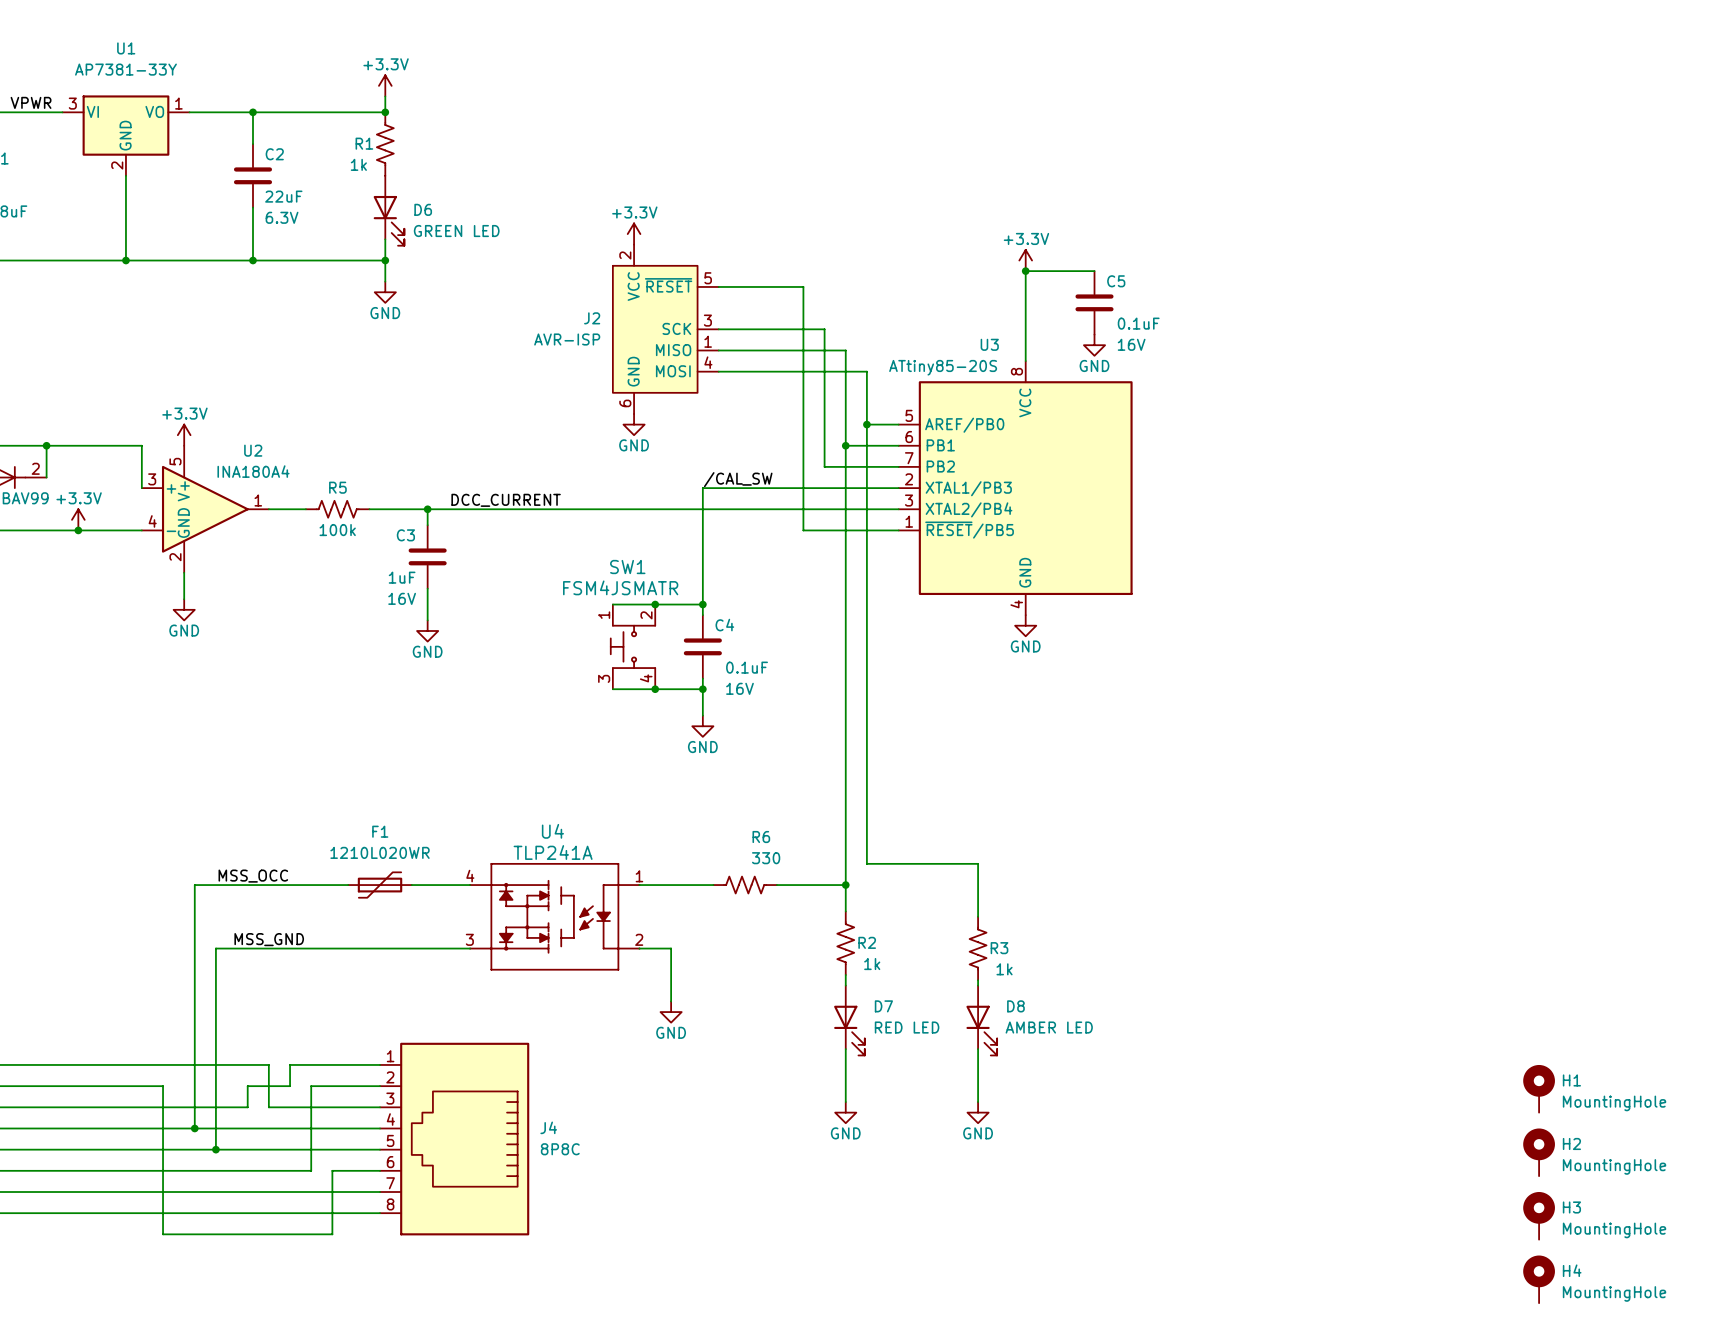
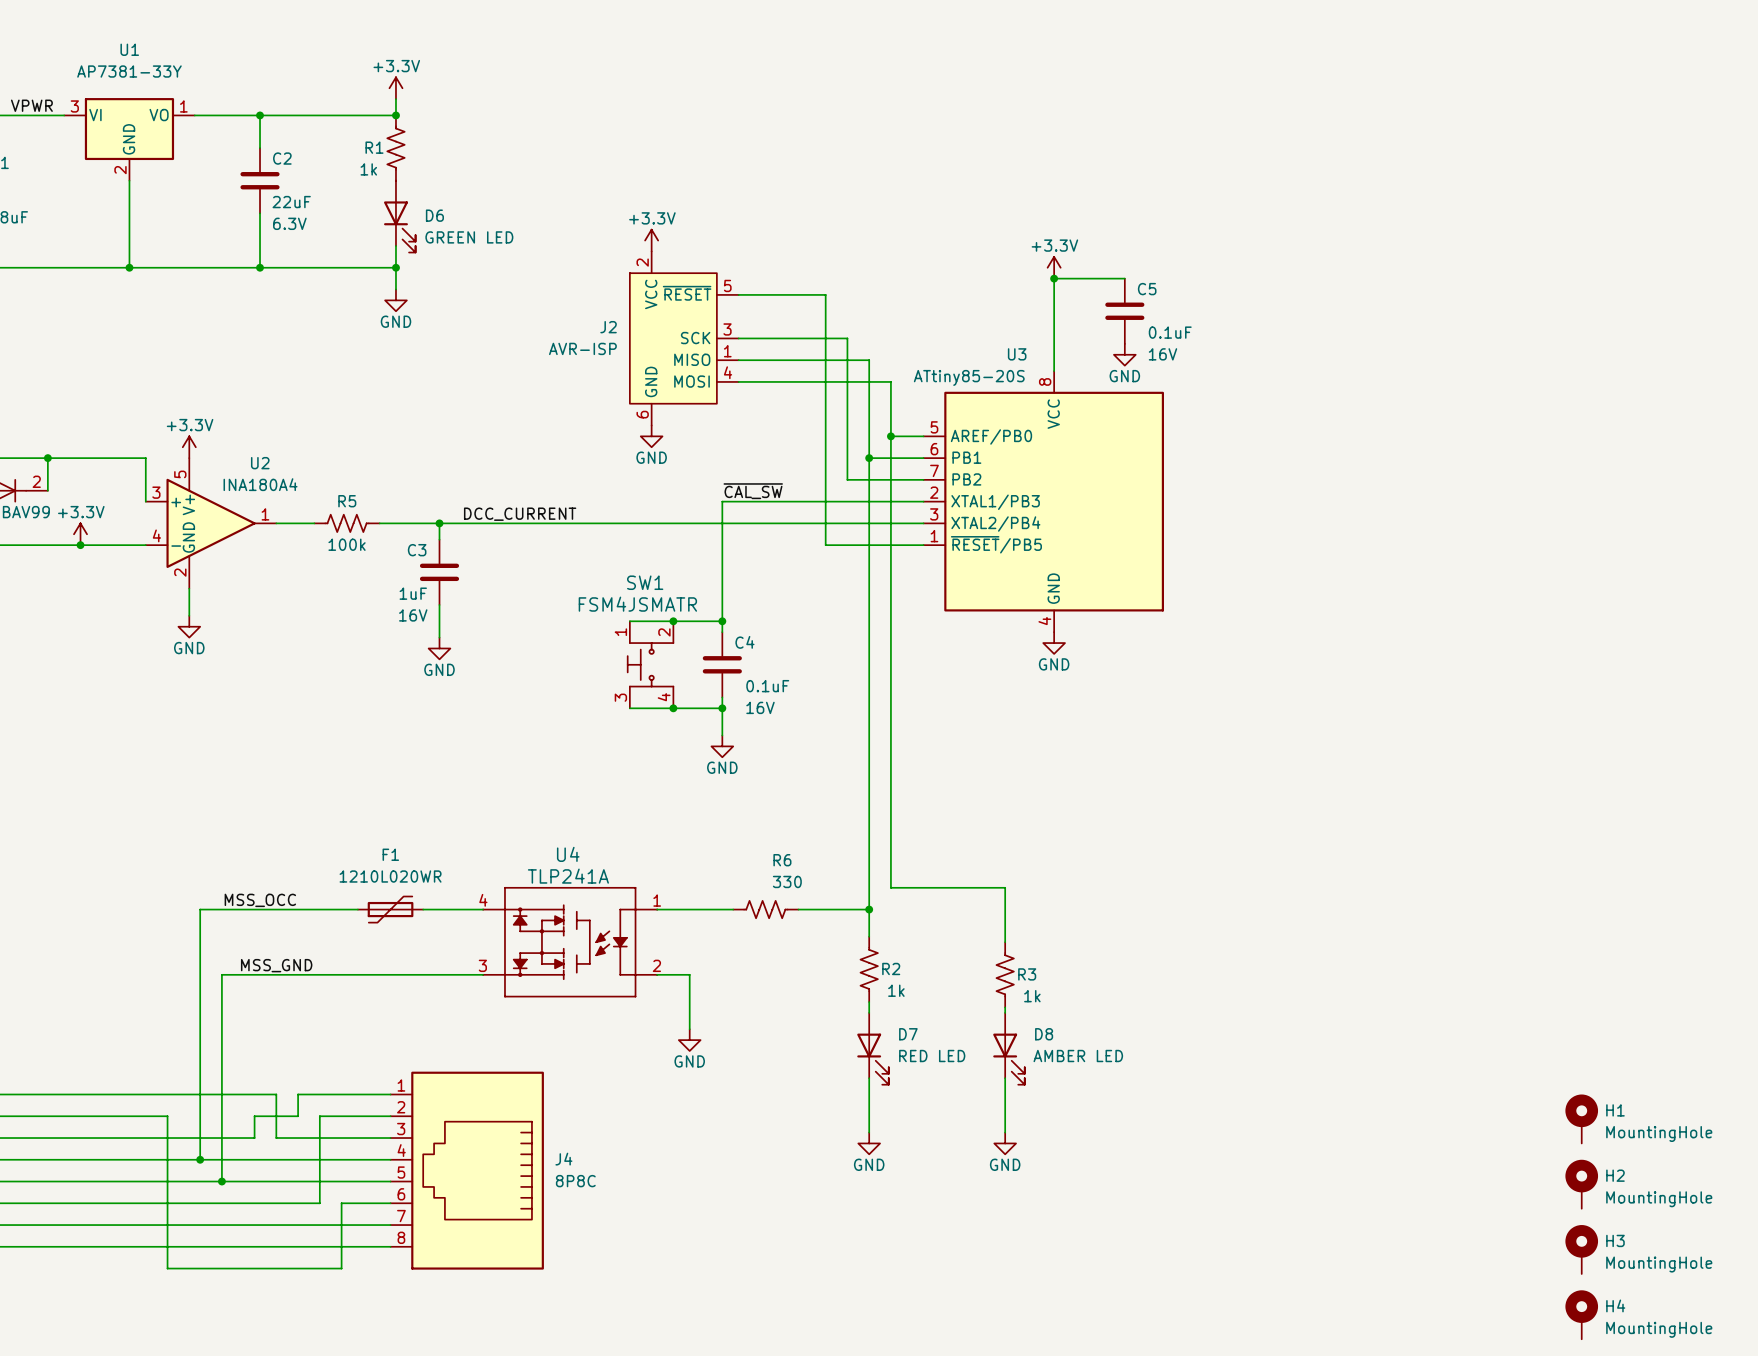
label: /CAL_SW (738, 479) -> ~{CAL_SW} (753, 491)

